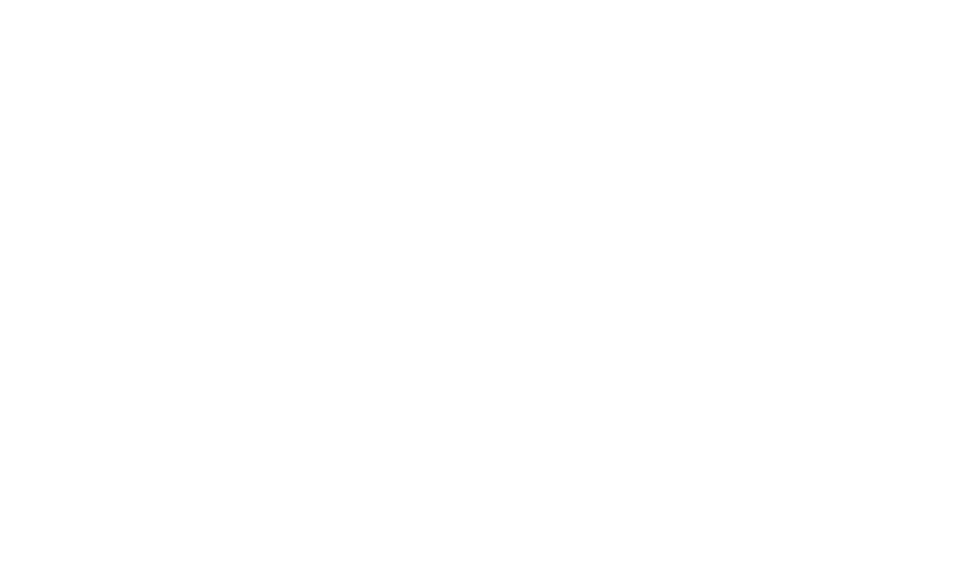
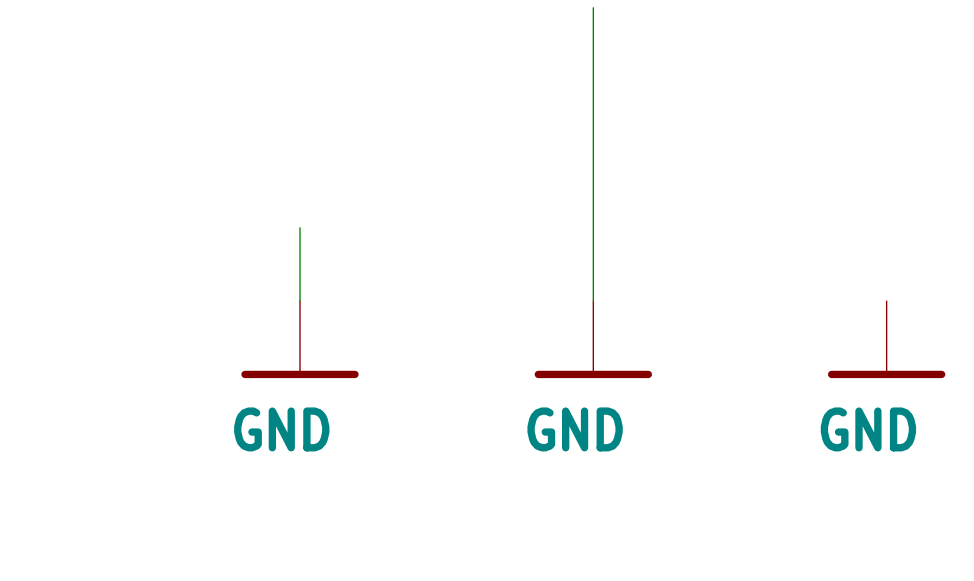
wire: none -> (593, 7) (593, 301)
wire: none -> (300, 227) (300, 301)
power symbol: none -> GND (300, 339)
power symbol: none -> GND (593, 339)
power symbol: none -> GND (886, 339)

